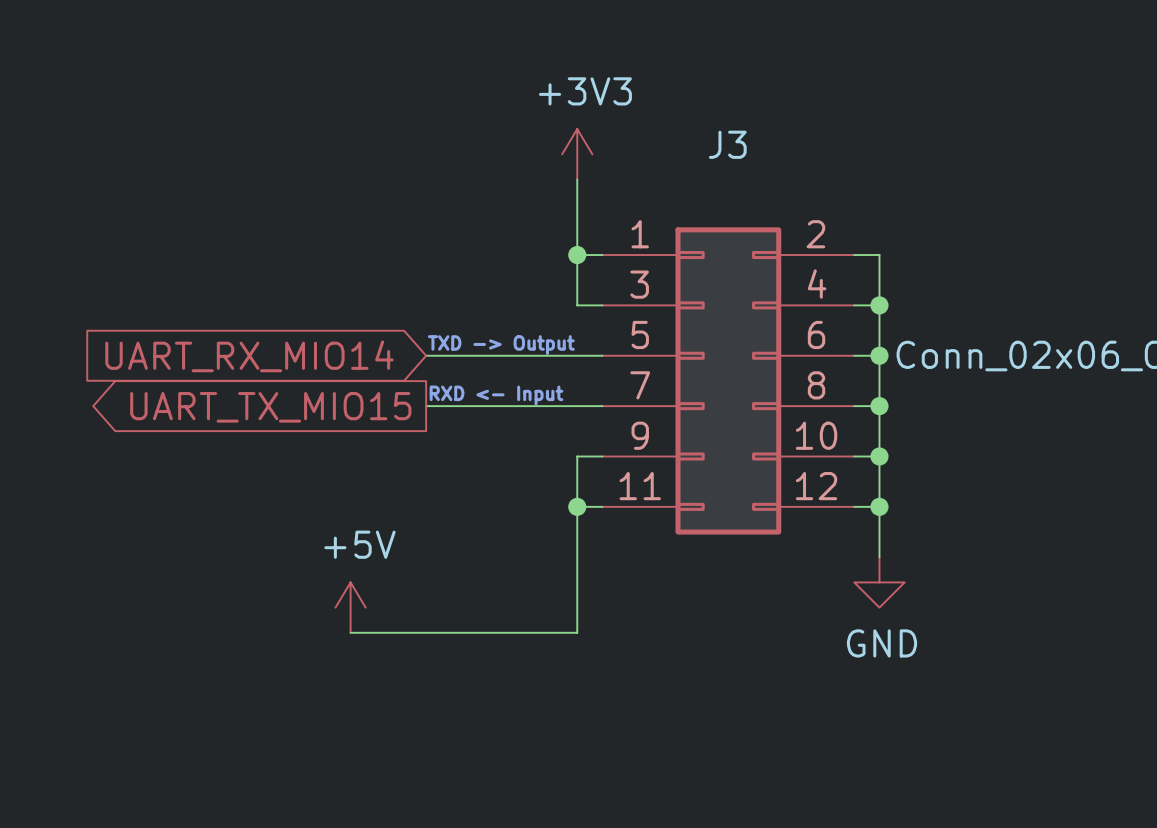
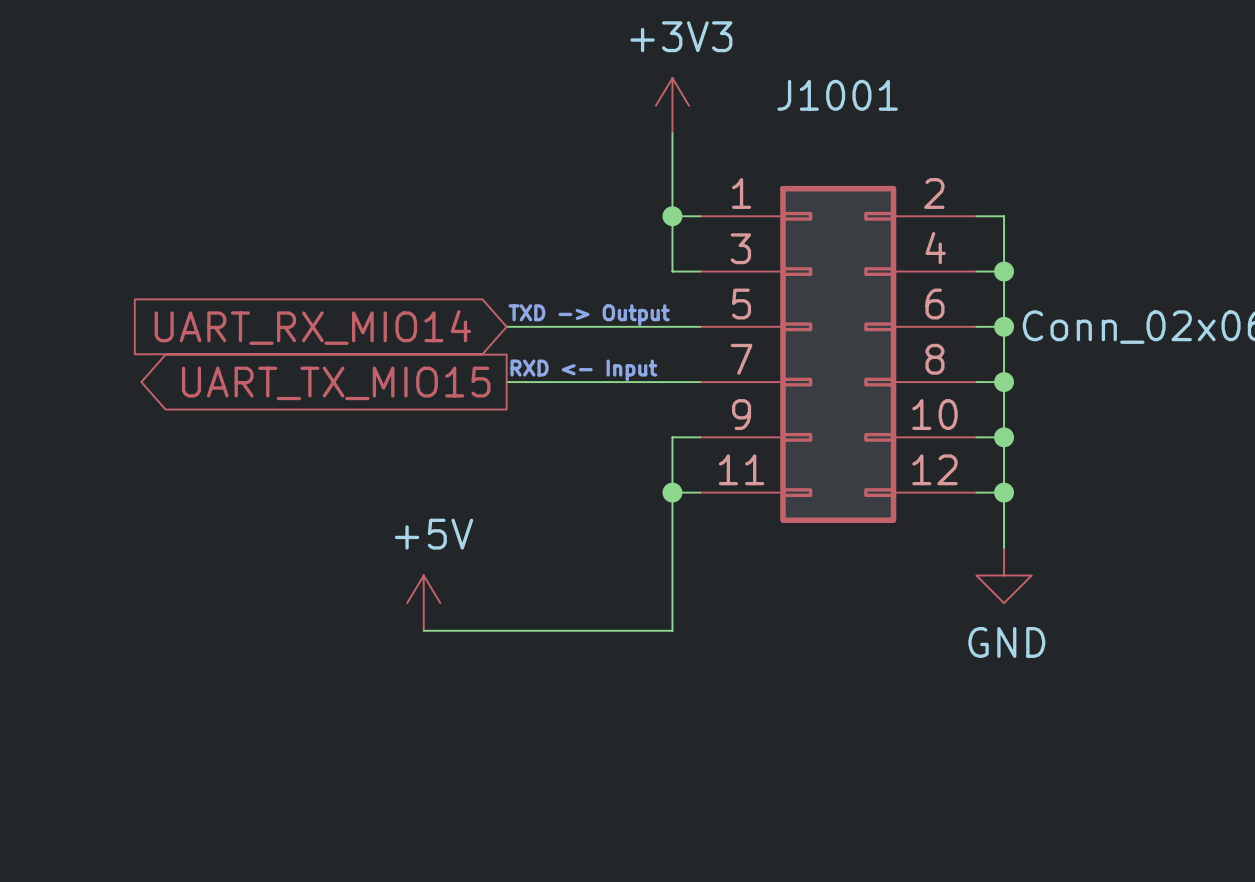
J3 name: J3 (727, 144) -> J1001 (837, 95)

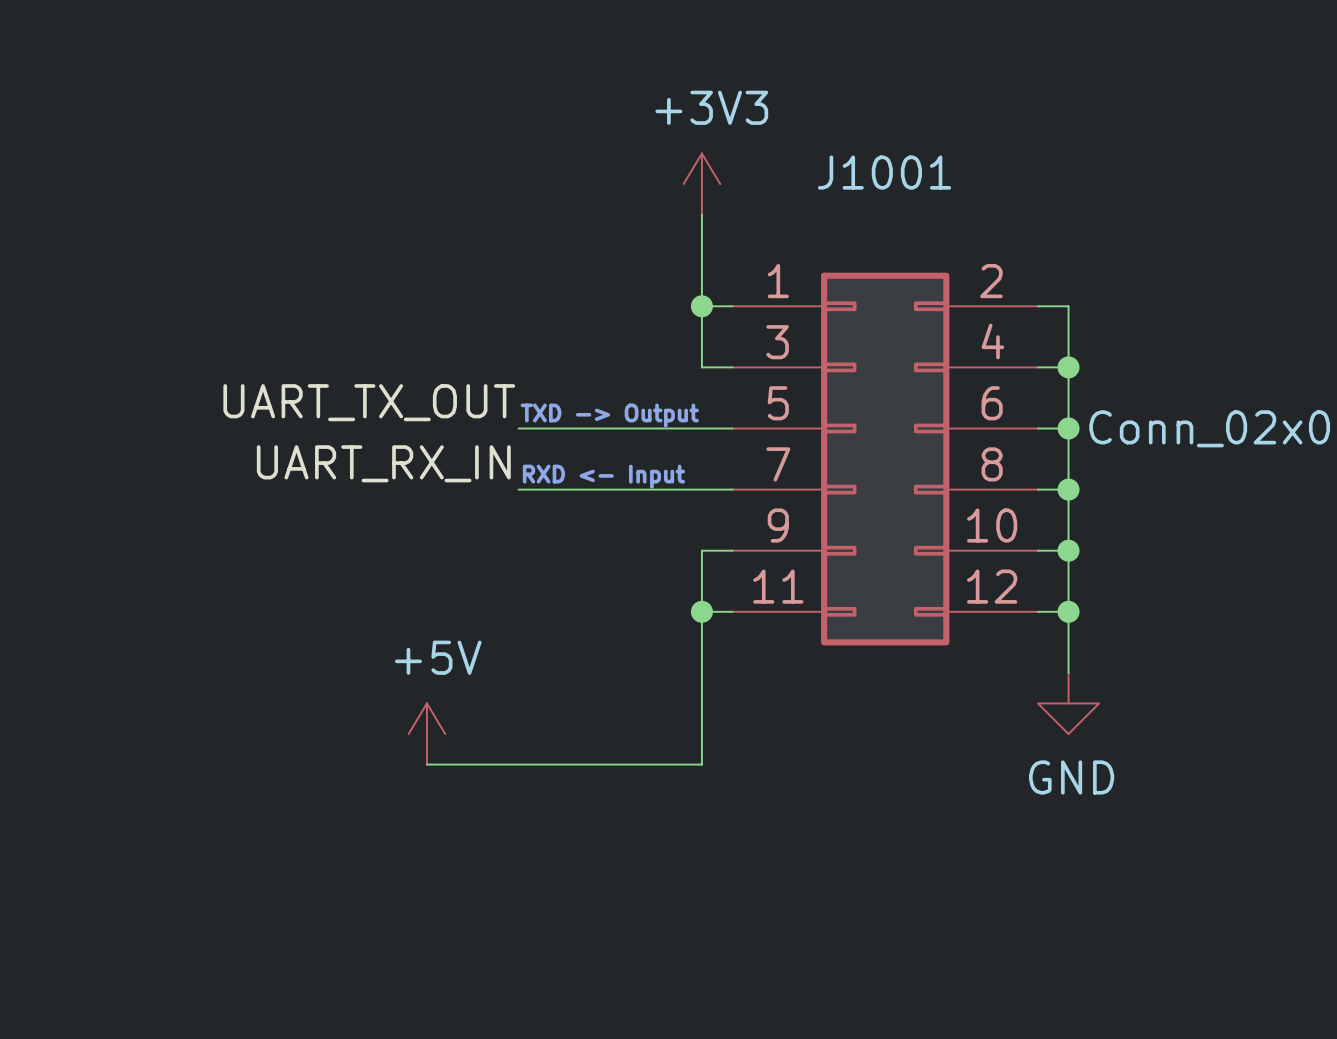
label: none -> UART_TX_OUT (369, 402)
global label: UART_RX_MIO14 (312, 327) -> none
label: none -> UART_RX_IN (383, 463)
global label: UART_TX_MIO15 (336, 383) -> none

